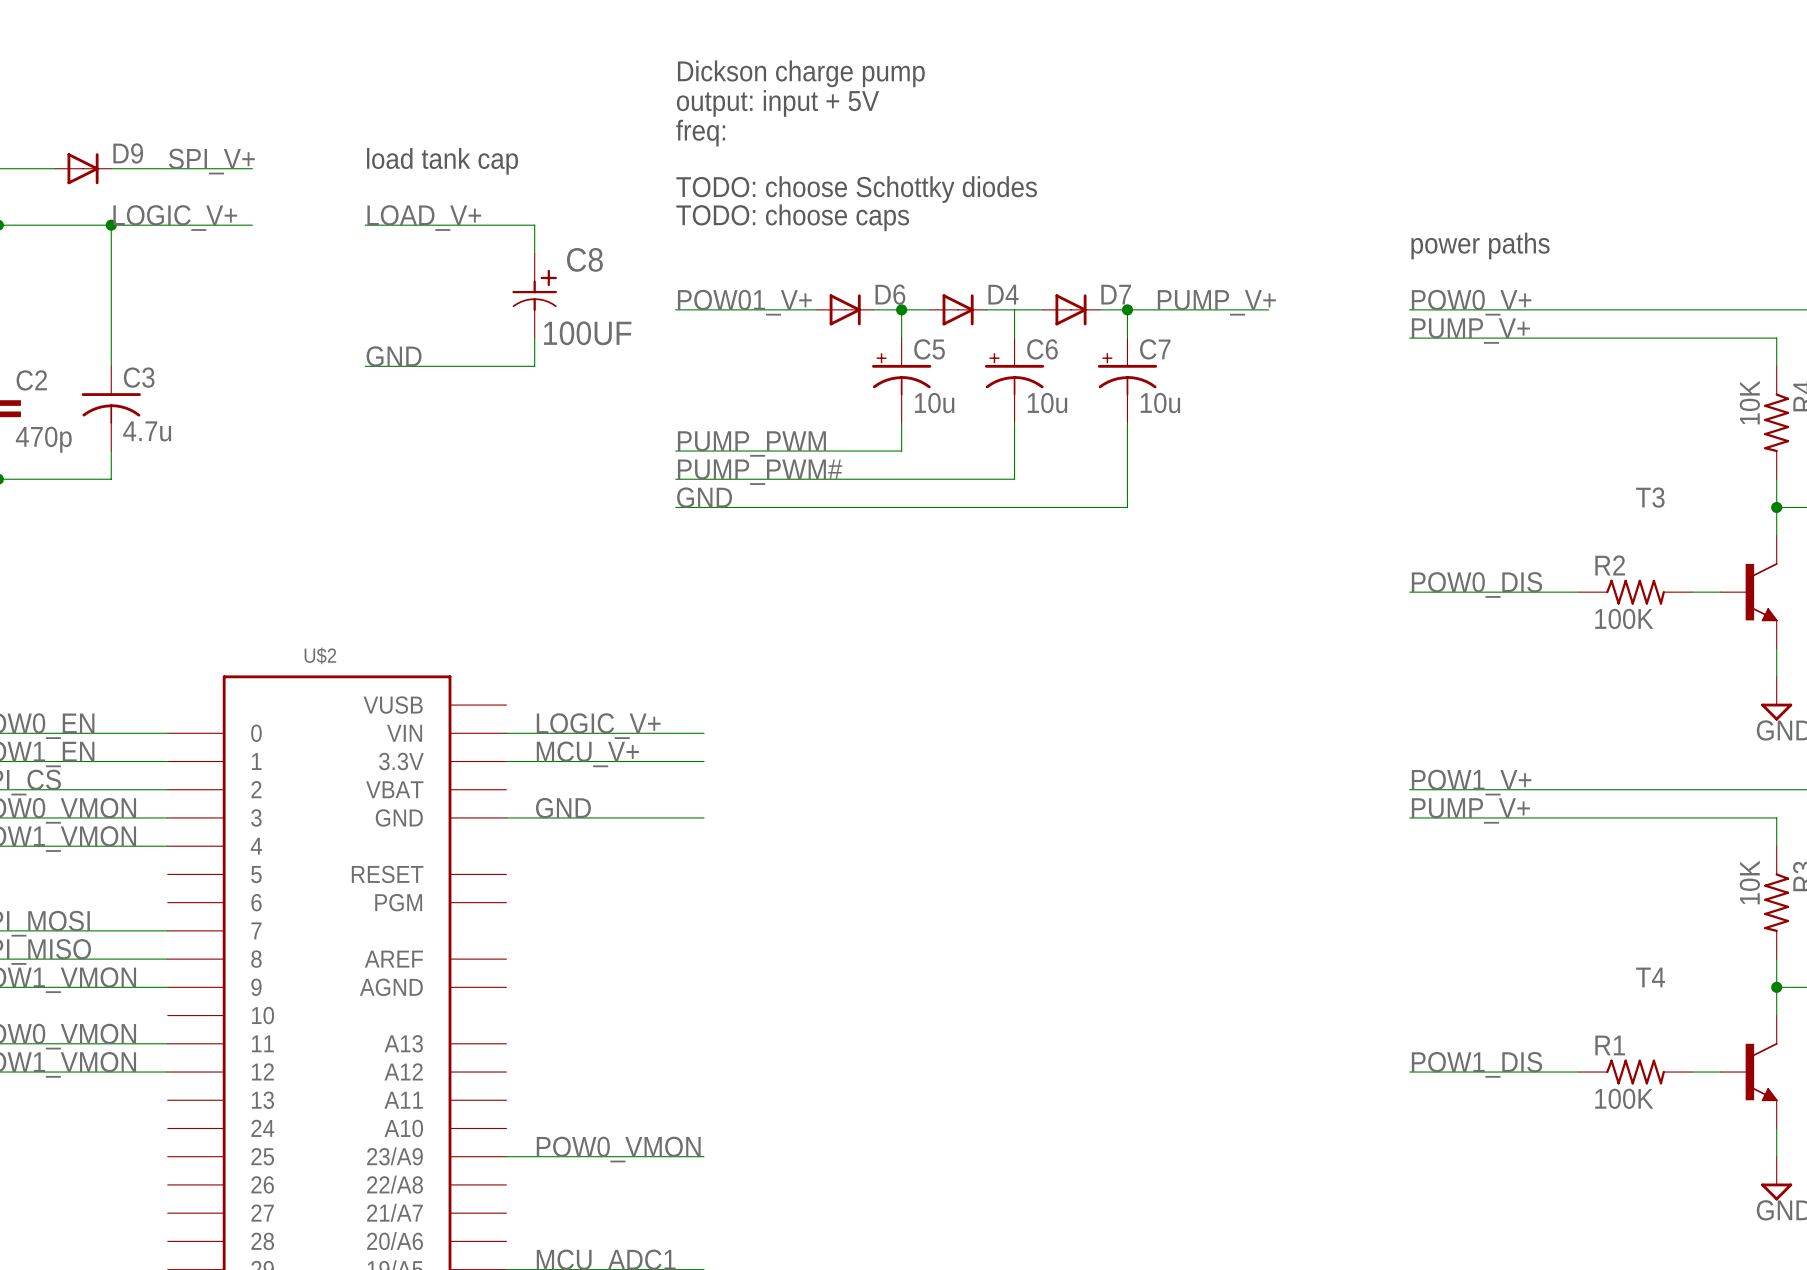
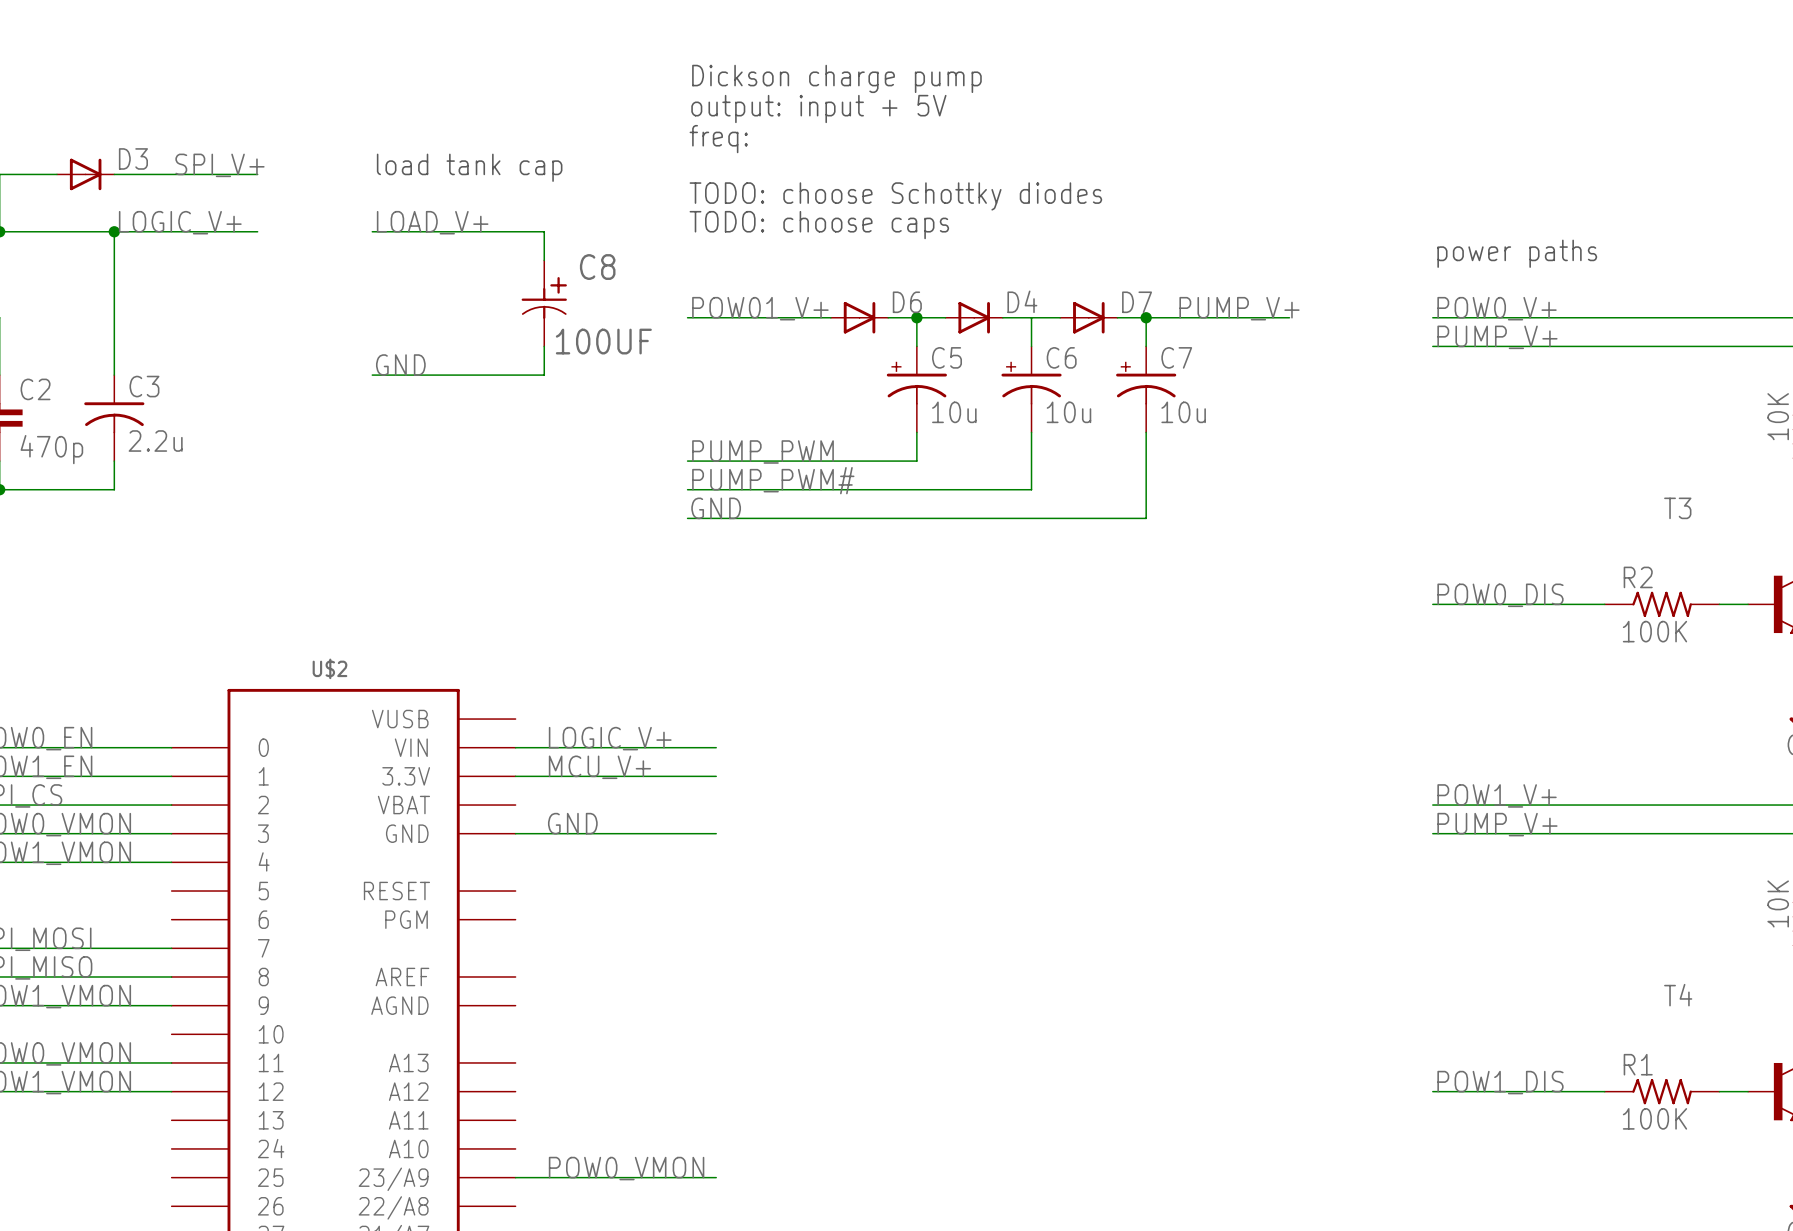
D9 name: D9 (128, 153) -> D3 (133, 158)
C3 value: 4.7u (147, 431) -> 2.2u (155, 441)

